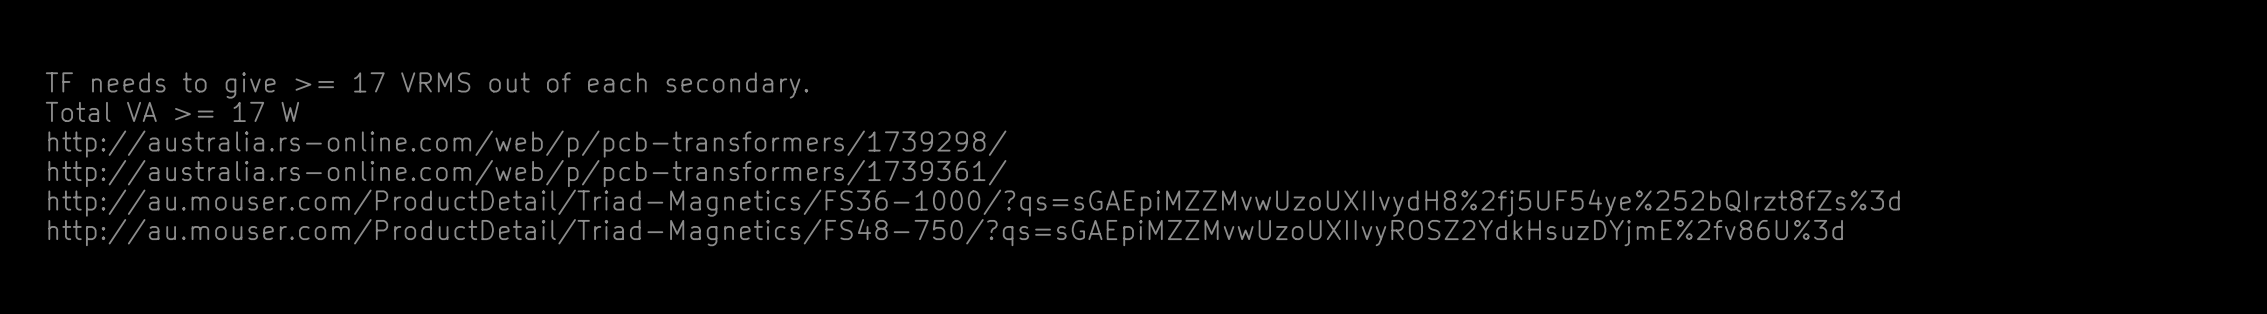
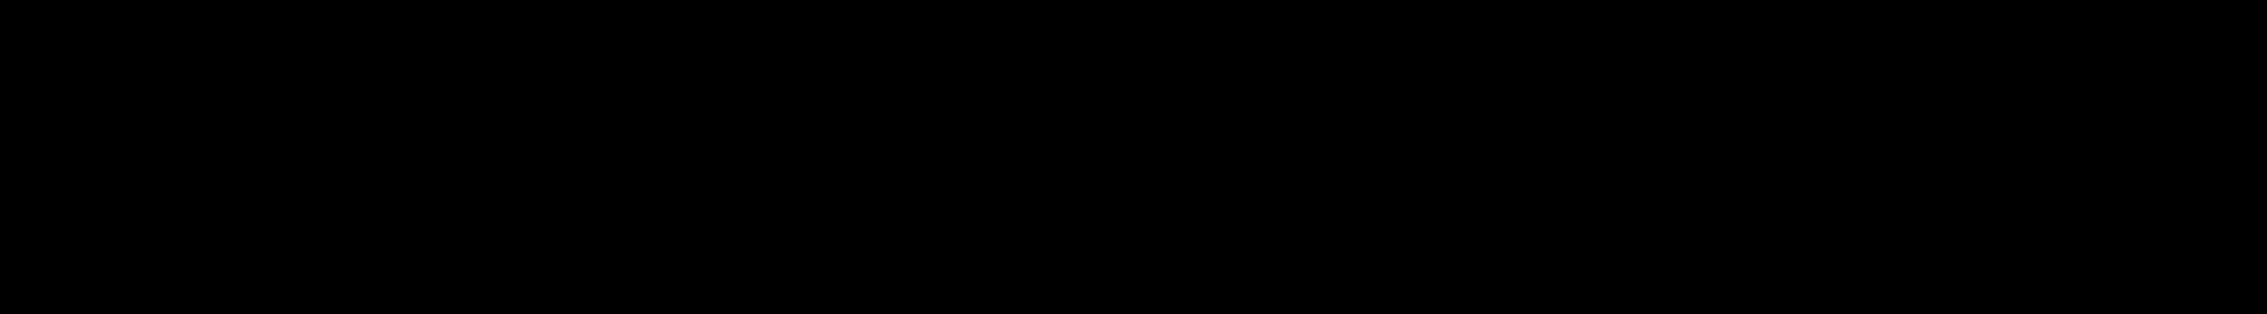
text: TF needs to give >= 17 VRMS out of each secondary. (427, 85) -> none
text: Total VA >= 17 W (172, 111) -> none
text: http://australia.rs-online.com/web/p/pcb-transformers/1739298/ (527, 144) -> none
text: http://australia.rs-online.com/web/p/pcb-transformers/1739361/ (527, 173) -> none
text: http://au.mouser.com/ProductDetail/Triad-Magnetics/FS36-1000/?qs=sGAEpiMZZMvwUzoUXIIvydH8%2fj5UF54ye%252bQIrzt8fZs%3d (974, 203) -> none
text: http://au.mouser.com/ProductDetail/Triad-Magnetics/FS48-750/?qs=sGAEpiMZZMvwUzoUXIIvyROSZ2YdkHsuzDYjmE%2fv86U%3d (945, 232) -> none

